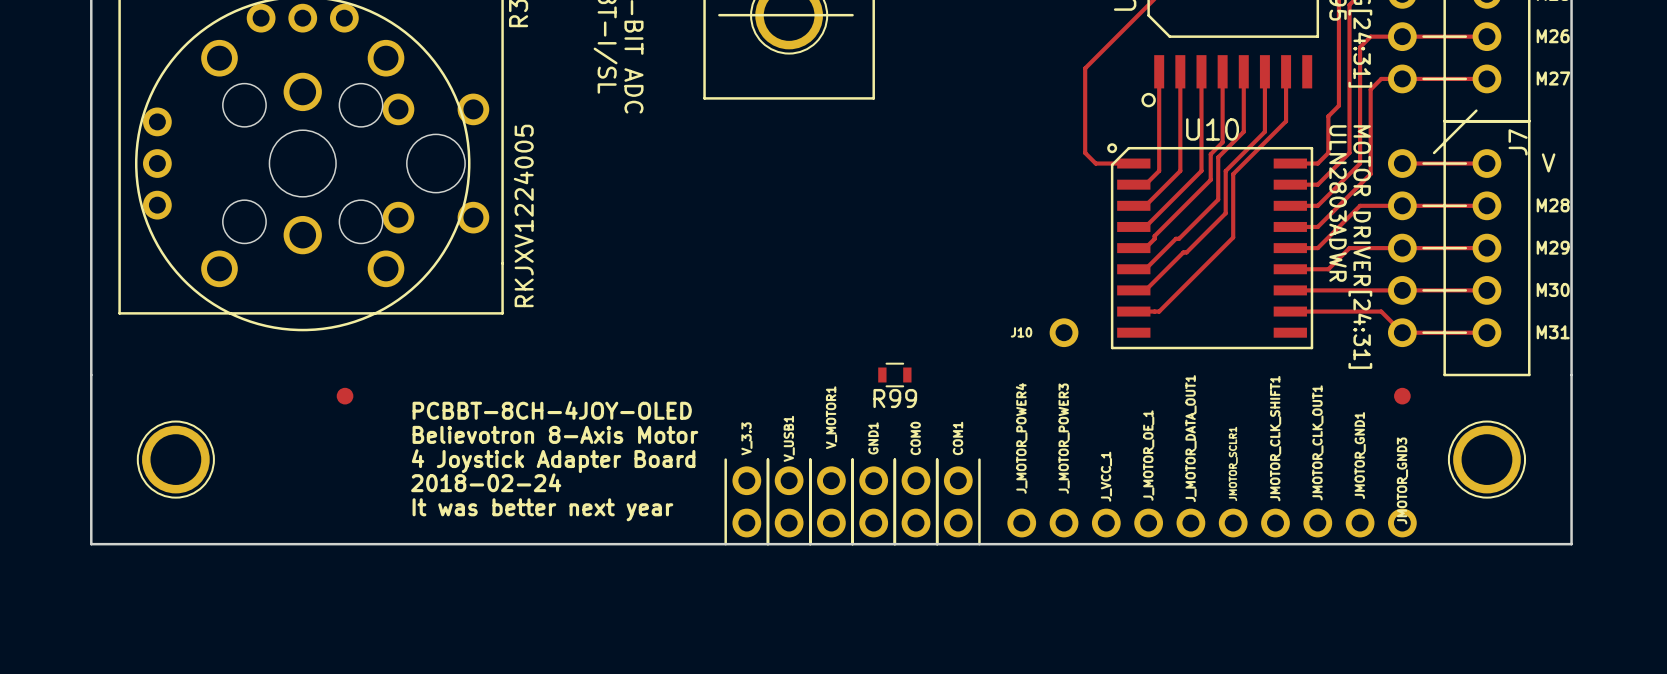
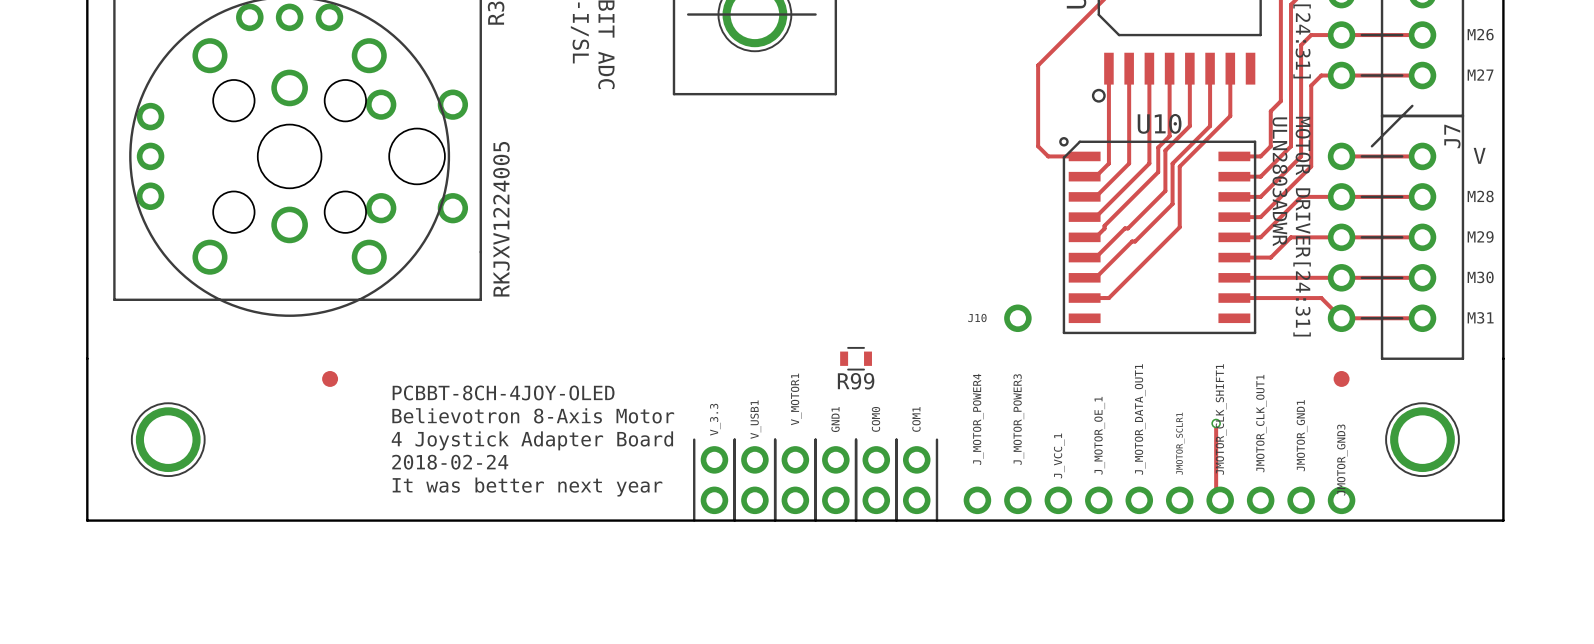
track: none -> (1216, 423) (1216, 496) (1220, 500)
via: none -> (1216, 423)

